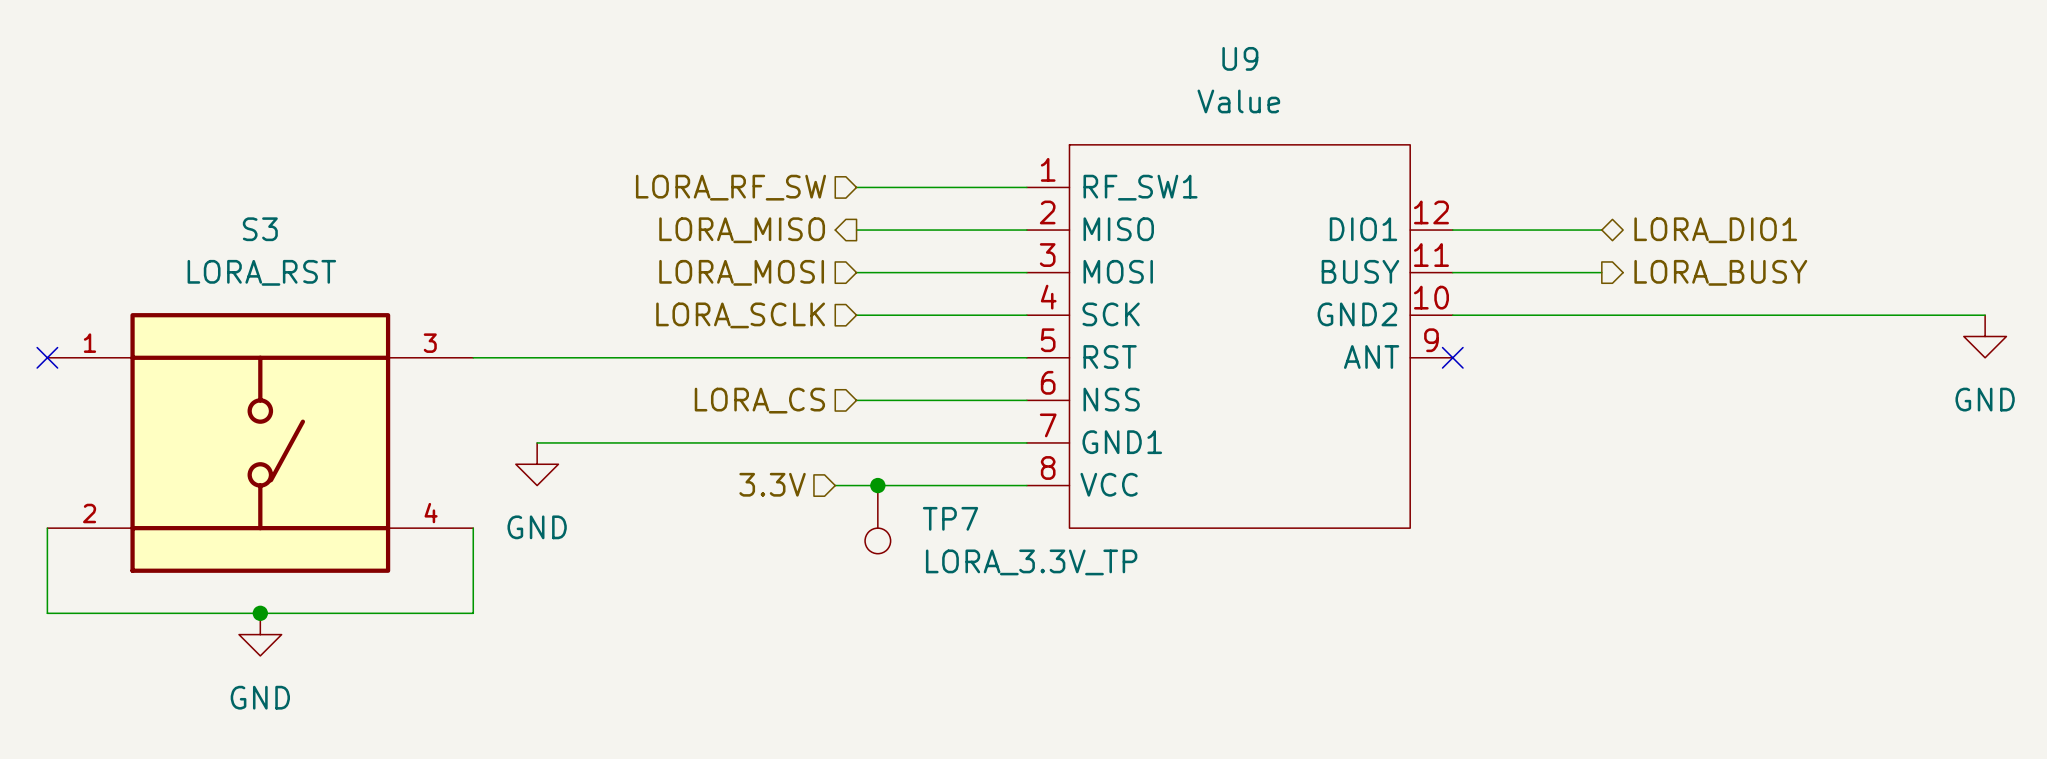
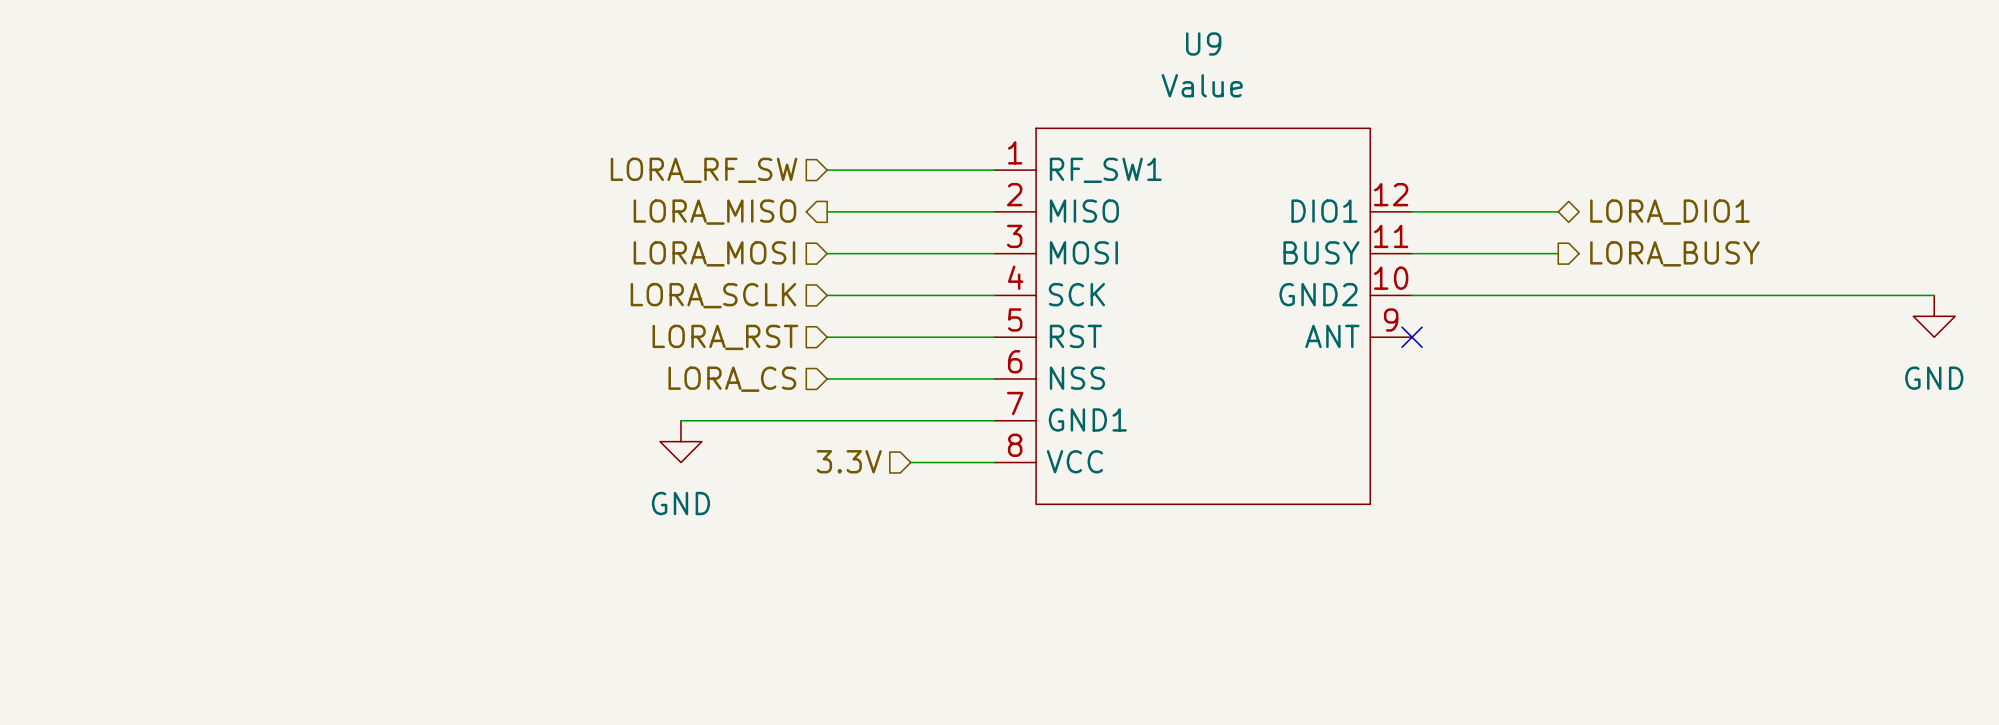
no-connect mark: (47, 357) -> none
wire: (473, 357) (856, 357) -> none
hierarchical label: none -> LORA_RST (725, 337)
S3: LORA_RST (260, 442) -> none
wire: (537, 442) (707, 442) -> none
power symbol position: GND (537, 464) -> GND (680, 441)
hierarchical label position: 3.3V (772, 484) -> 3.3V (849, 461)
wire: (835, 485) (941, 485) -> none
junction: (877, 485) -> none
TP7: LORA_3.3V_TP (877, 519) -> none
wire: (47, 528) (47, 613) (473, 613) (473, 528) -> none
junction: (260, 613) -> none
power symbol: GND (260, 634) -> none

